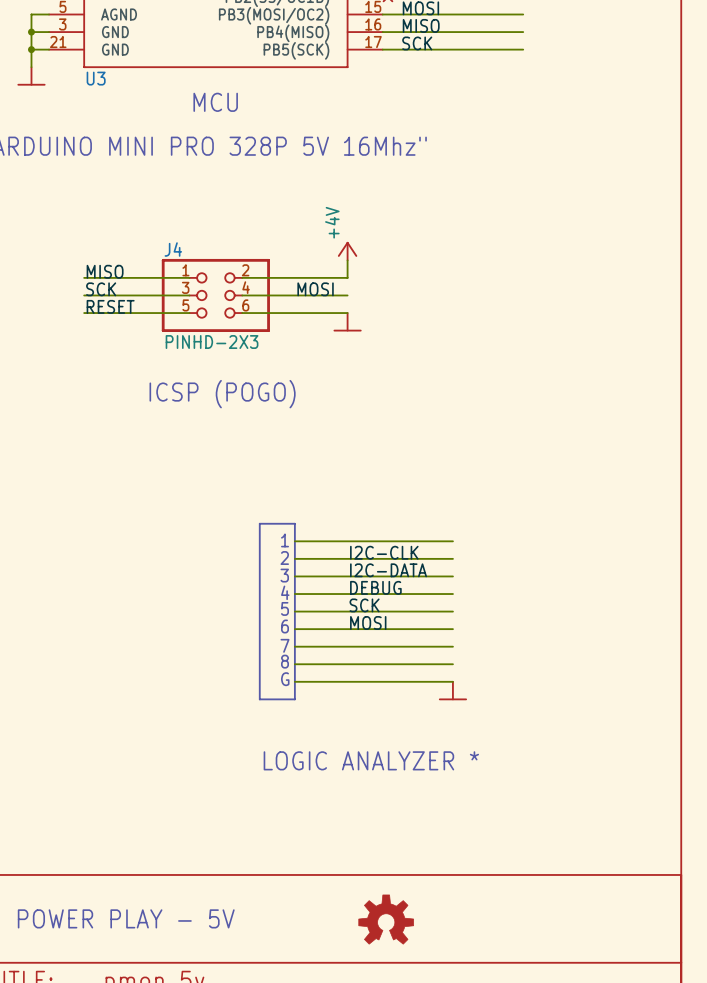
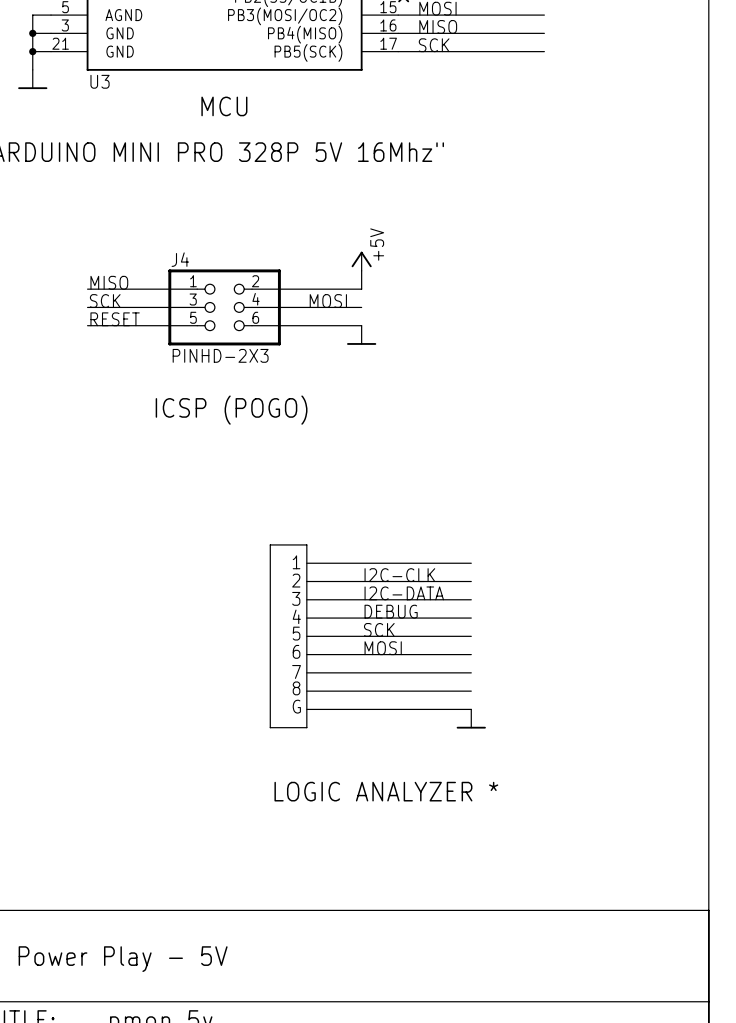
power symbol: +4V (347, 251) -> +5V (361, 261)
text: POWER PLAY - 5V (126, 918) -> Power Play - 5V (123, 959)
part: (386, 919) -> none

